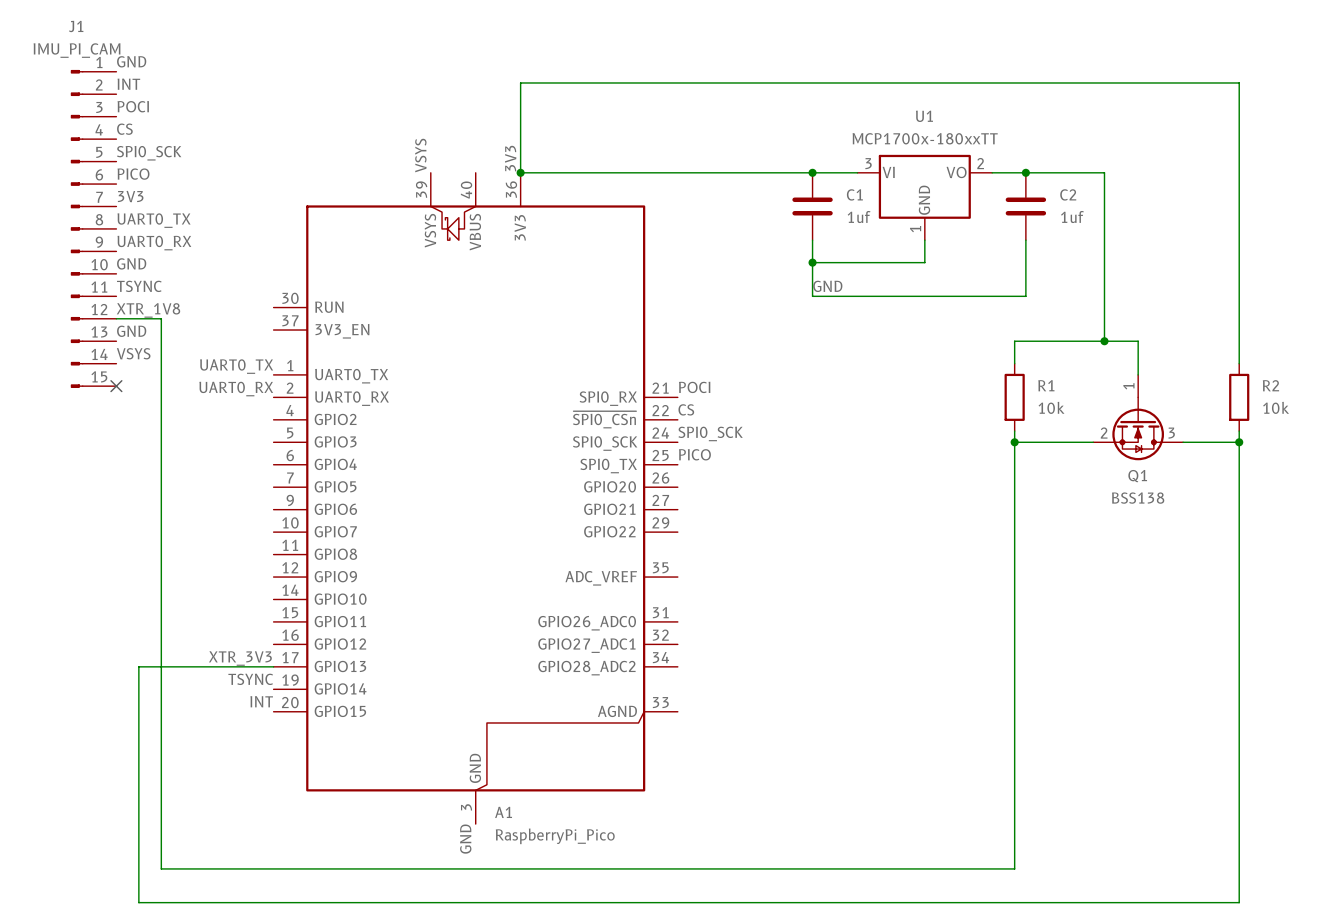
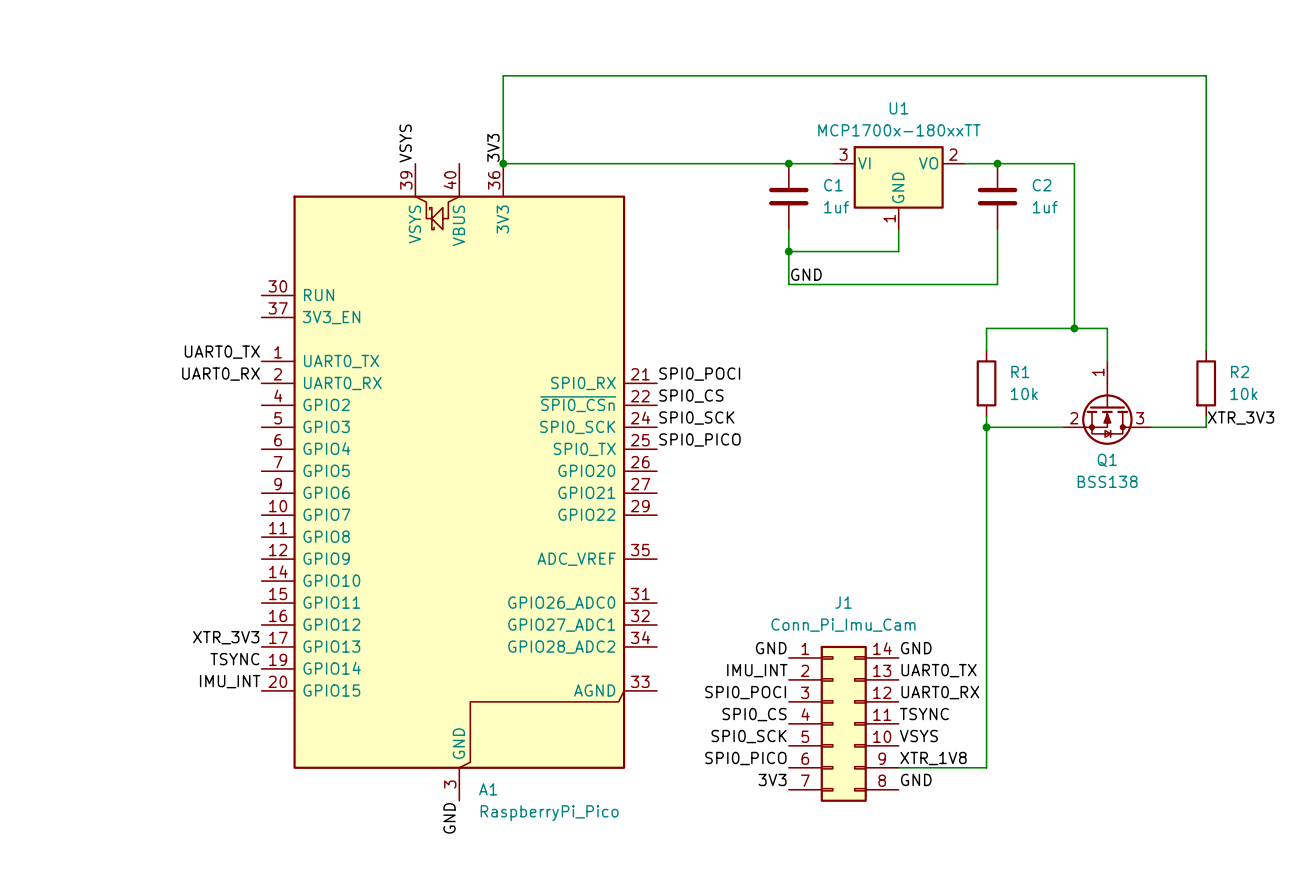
J1 name position: J1 (76, 26) -> J1 (843, 602)
J1 value: IMU_PI_CAM (77, 50) -> Conn_Pi_Imu_Cam (843, 625)
label: GND (131, 61) -> none
J1 symbol: [70, 69, 117, 388] -> [788, 645, 899, 802]
label: INT (128, 84) -> none
label: POCI (133, 106) -> none
label: CS (124, 129) -> none
label: SPI0_SCK (149, 153) -> none
label: PICO (133, 174) -> none
label: 3V3 (130, 196) -> none
label: UART0_TX (154, 220) -> none
label: UART0_RX (154, 243) -> none
label: GND (131, 263) -> none
label: TSYNC (139, 286) -> none
label: XTR_1V8 (148, 310) -> none
wire: (116, 318) (161, 318) (161, 868) (1014, 868) (1014, 790) -> (898, 767) (986, 767)
label: GND (131, 331) -> none
label: VSYS (133, 353) -> none
no-connect mark: (116, 386) -> none
label: POCI (694, 387) -> SPI0_POCI (699, 374)
label: CS (686, 409) -> SPI0_CS (691, 396)
label: none -> XTR_3V3 (1241, 418)
wire: (1239, 442) (1239, 902) (138, 902) (138, 666) (273, 666) -> none
junction: (1239, 442) -> none
label: PICO (694, 454) -> SPI0_PICO (700, 439)
label: none -> GND (771, 648)
label: none -> GND (916, 648)
label: none -> IMU_INT (757, 670)
label: none -> UART0_TX (939, 670)
label: INT (261, 701) -> IMU_INT (230, 681)
label: none -> SPI0_POCI (745, 692)
label: none -> UART0_RX (940, 692)
label: none -> TSYNC (924, 714)
label: none -> SPI0_CS (754, 714)
label: none -> VSYS (918, 736)
label: none -> SPI0_SCK (749, 736)
label: none -> SPI0_PICO (745, 758)
label: none -> XTR_1V8 (933, 758)
label: none -> 3V3 (772, 779)
label: none -> GND (916, 779)

